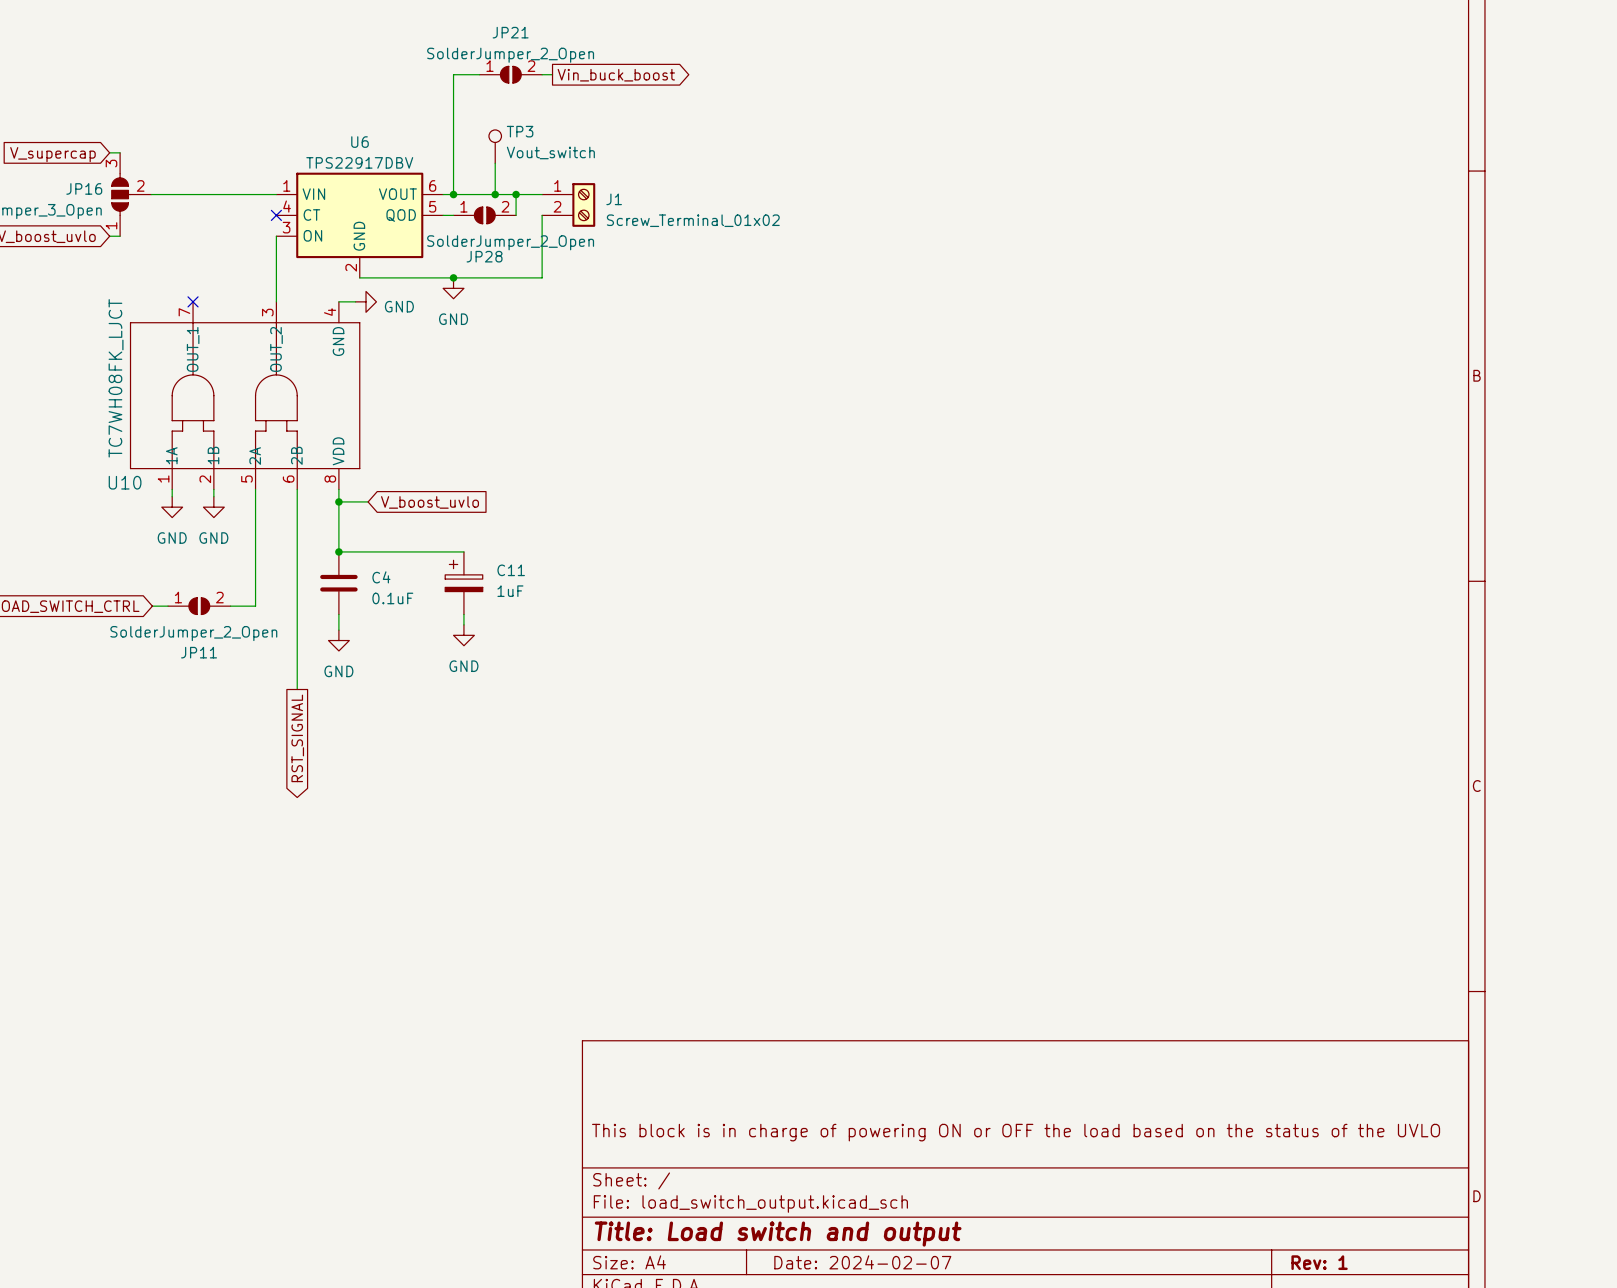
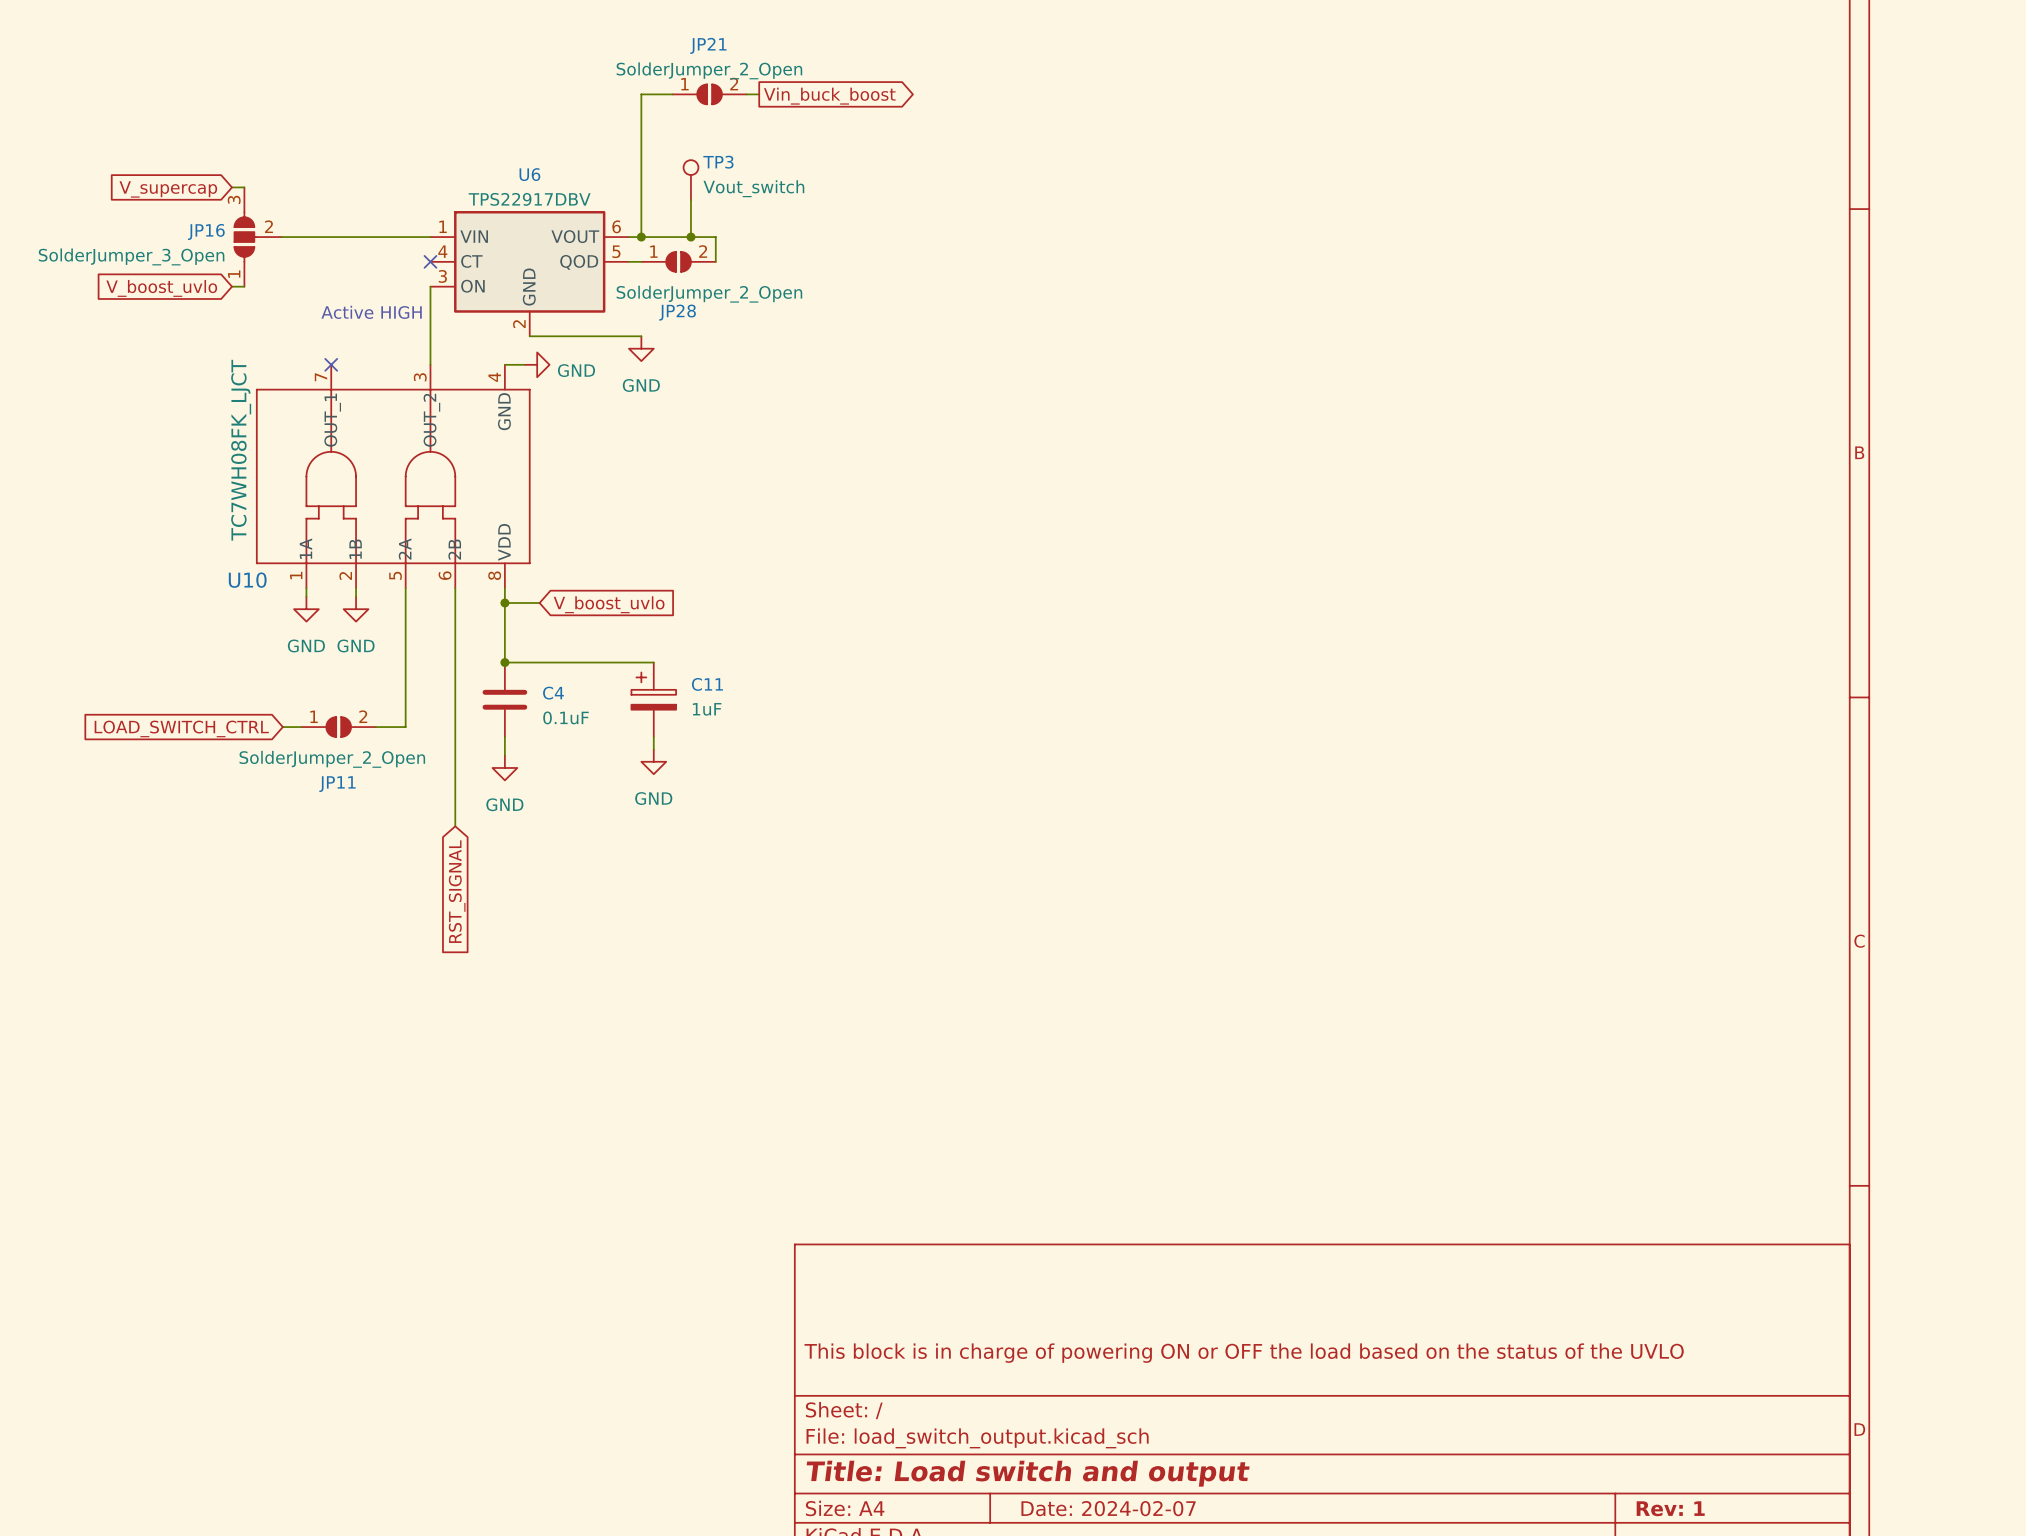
wire: (516, 194) (542, 194) -> none
junction: (516, 194) -> none
J1: Screw_Terminal_01x02 (568, 204) -> none
wire: (542, 215) (542, 277) (453, 277) -> none
text: none -> Active HIGH (371, 312)
junction: (453, 277) -> none
global label shape: output (297, 738) -> input (457, 891)

